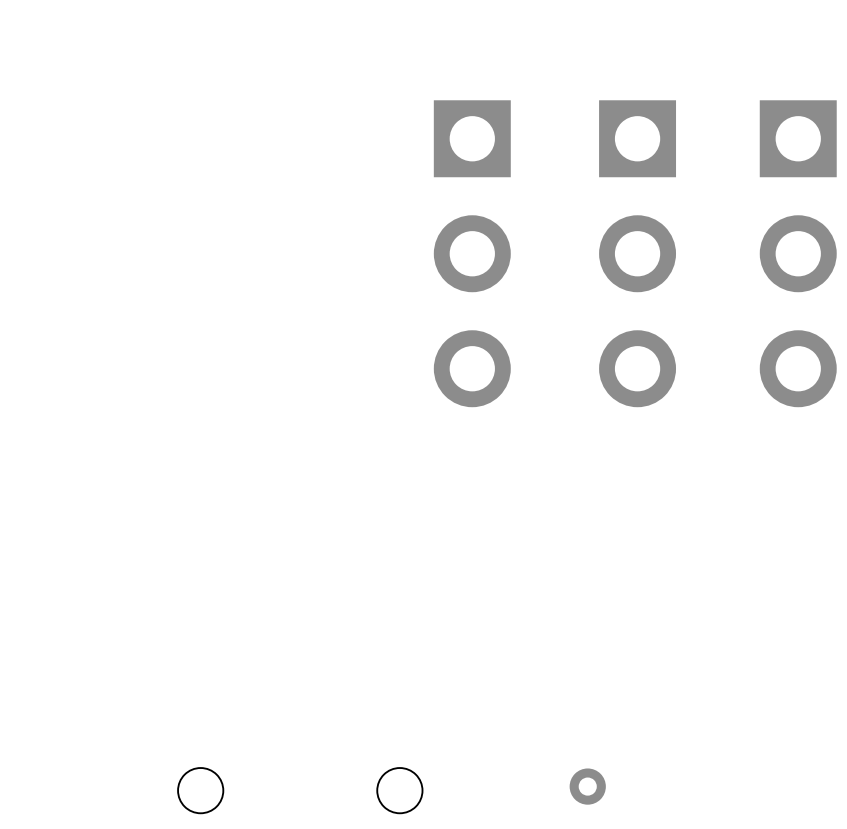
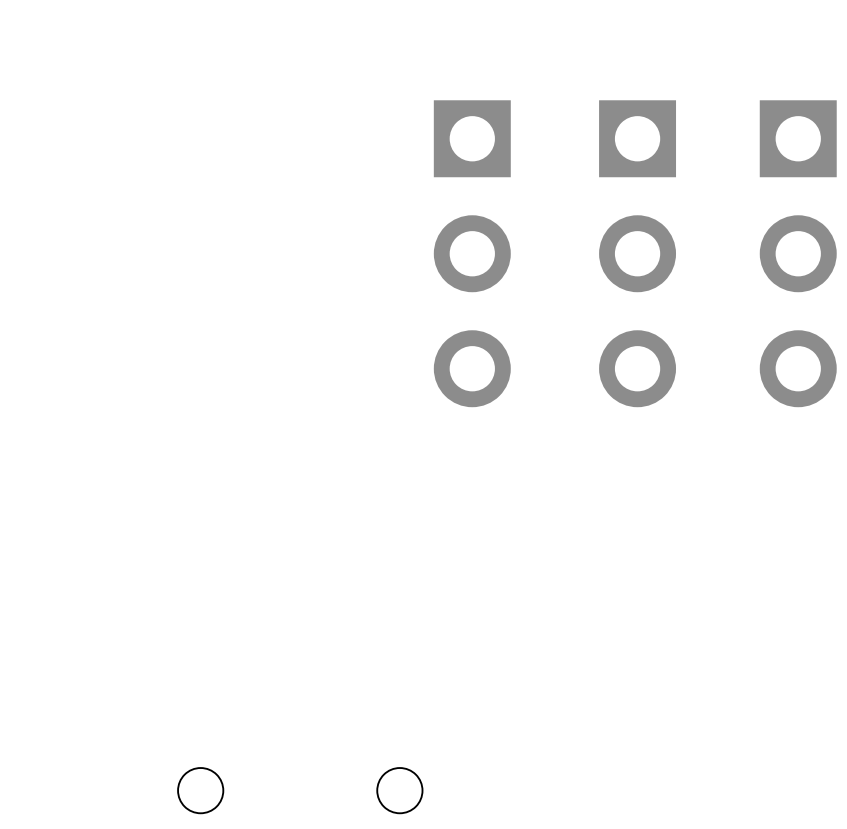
via: (587, 786) -> none

